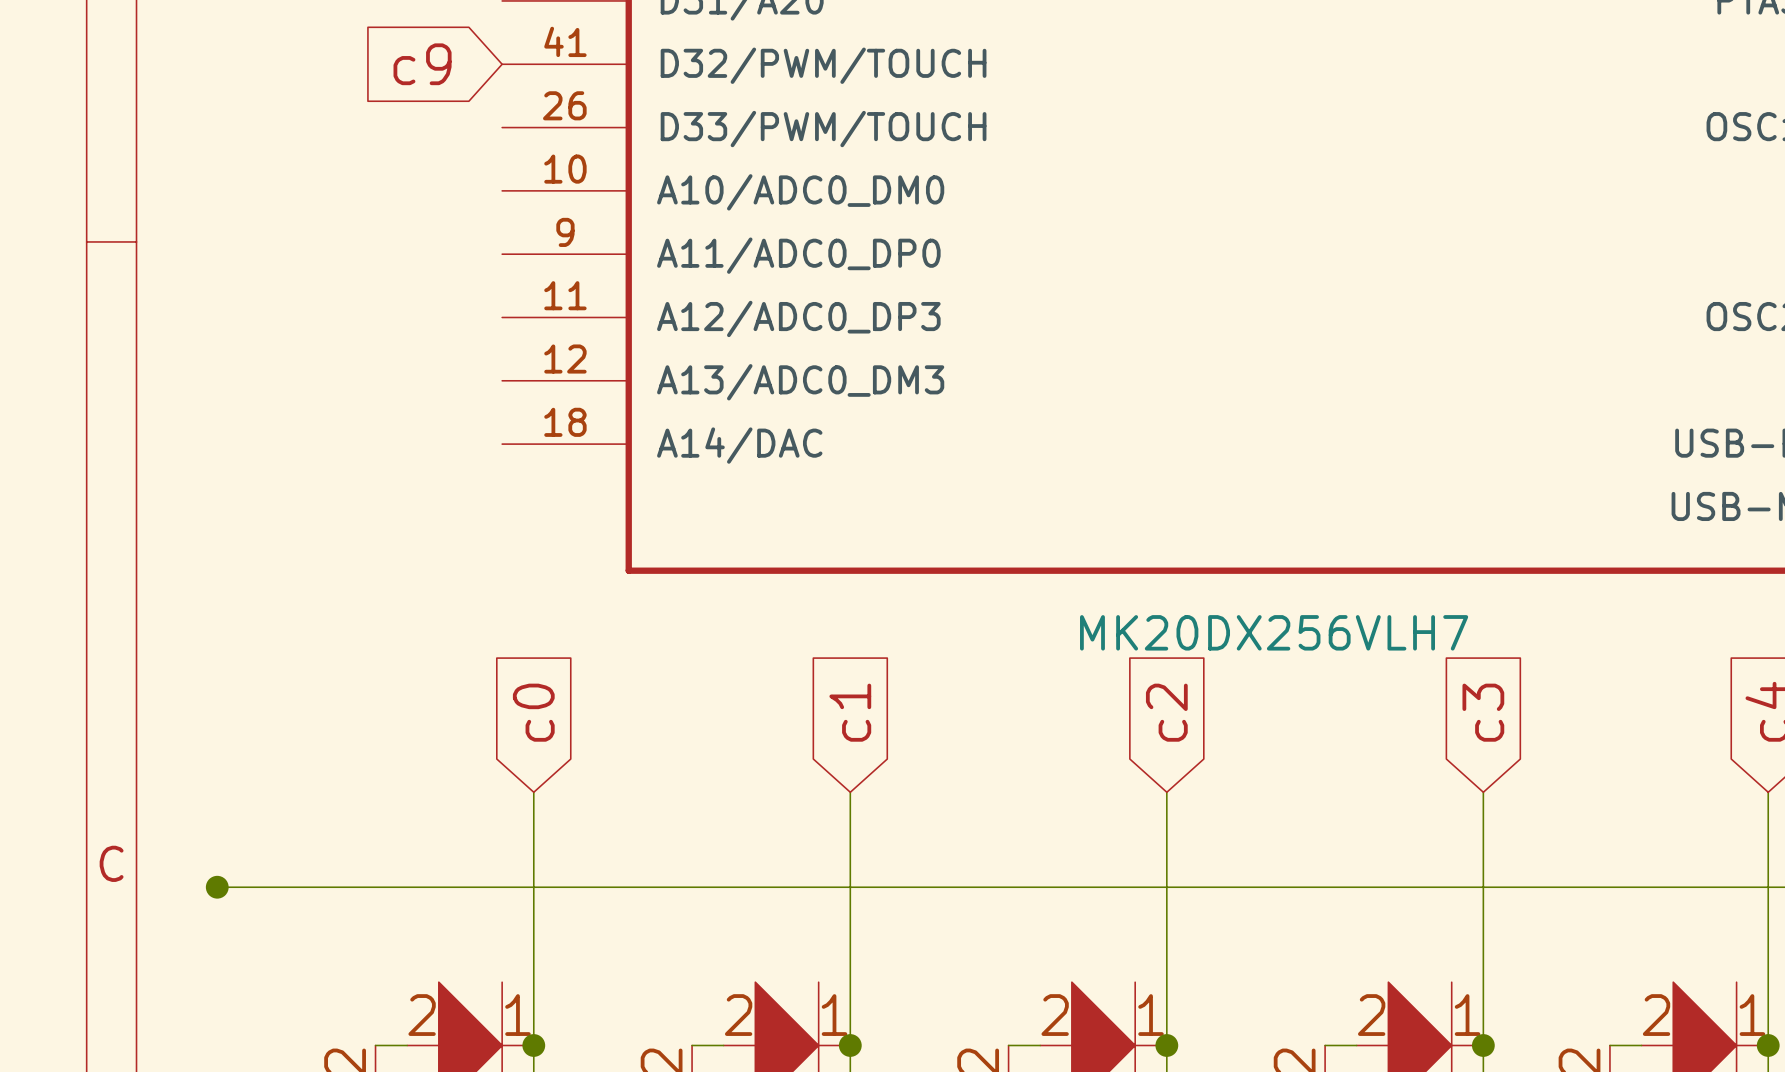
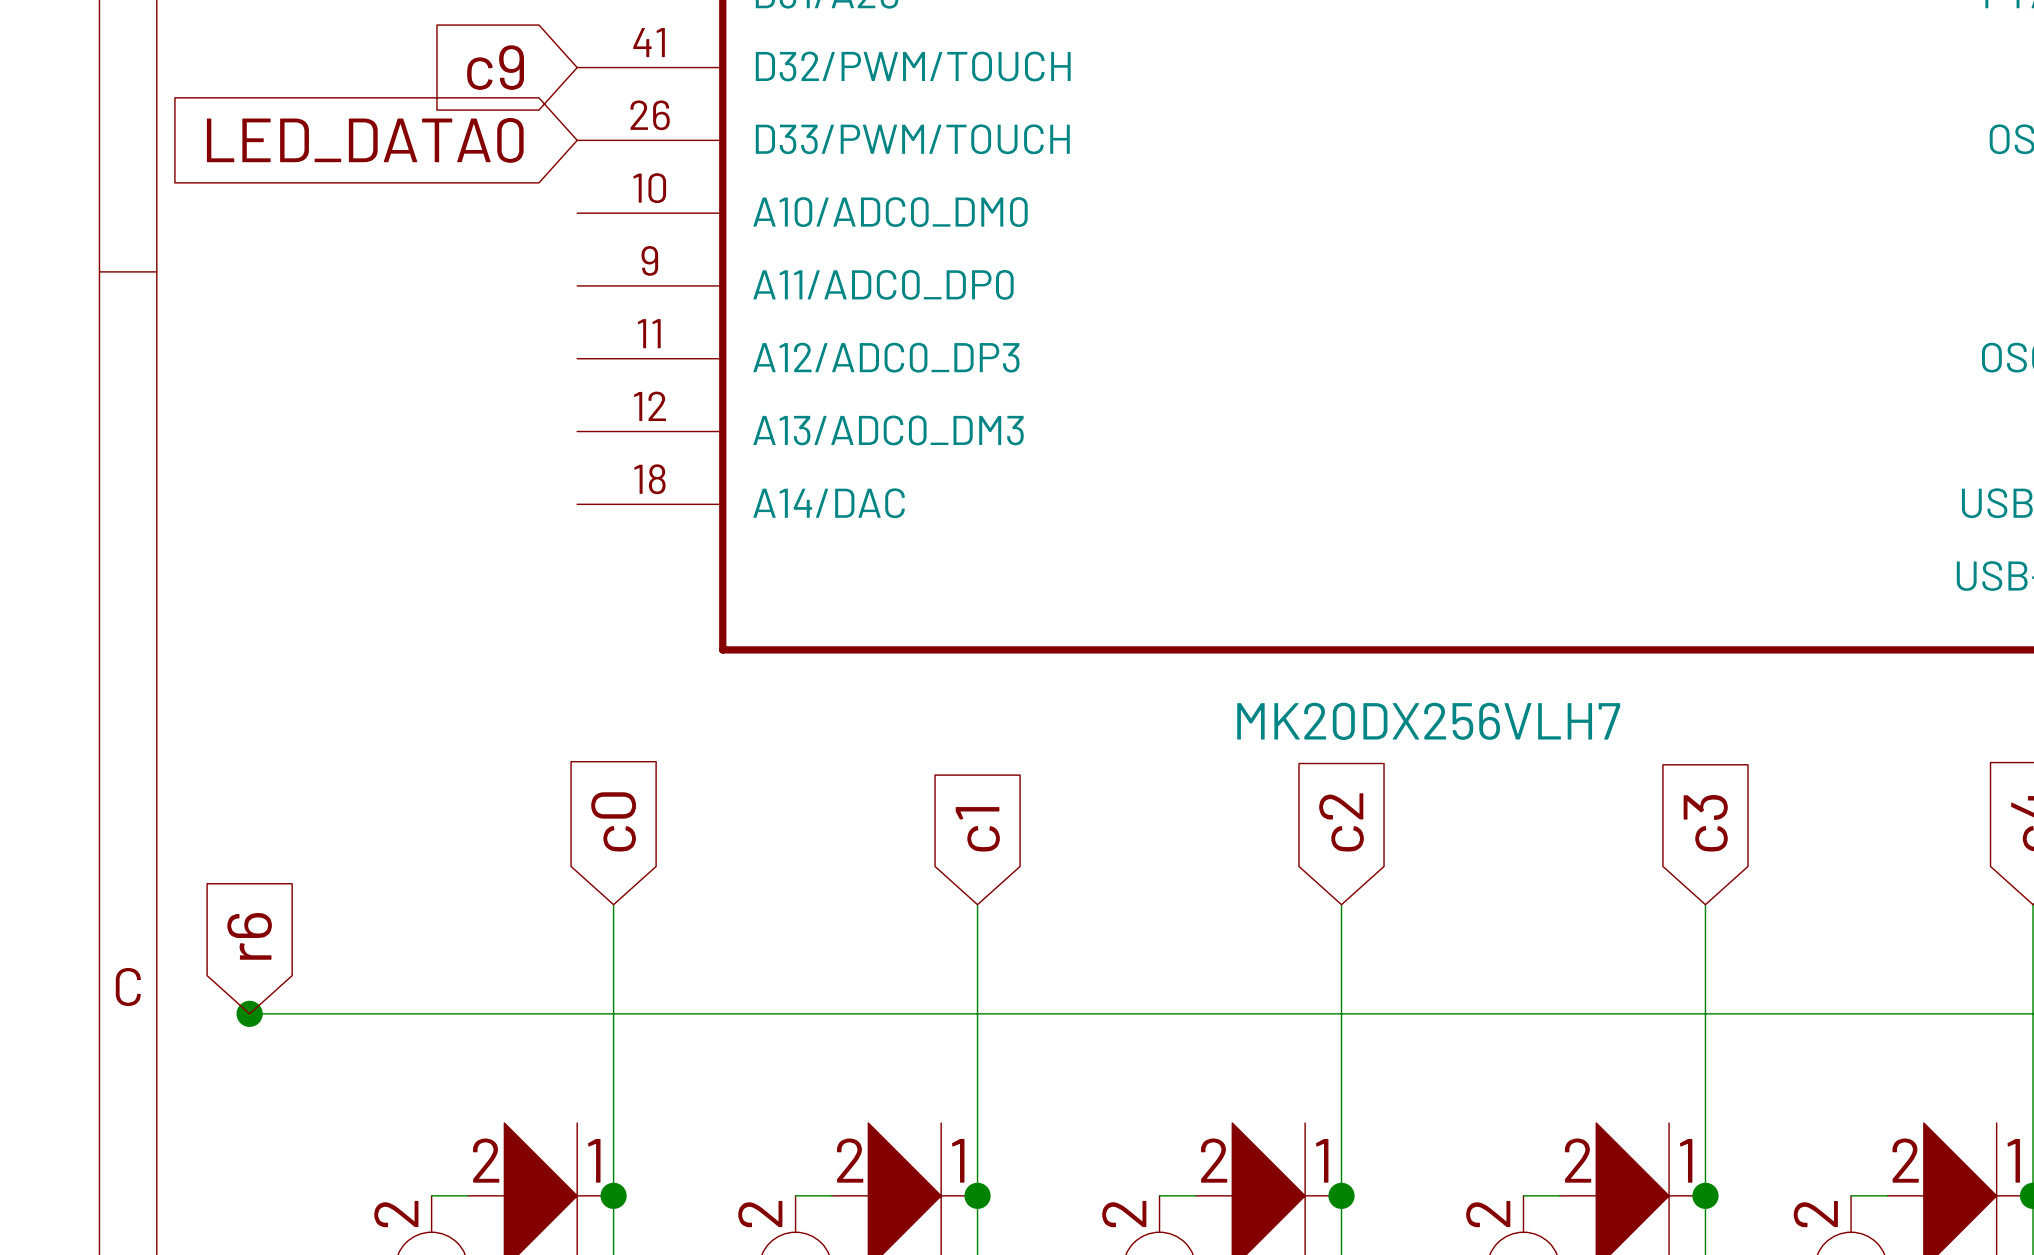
global label: none -> LED_DATA0 (365, 140)
global label: none -> r6 (249, 936)

